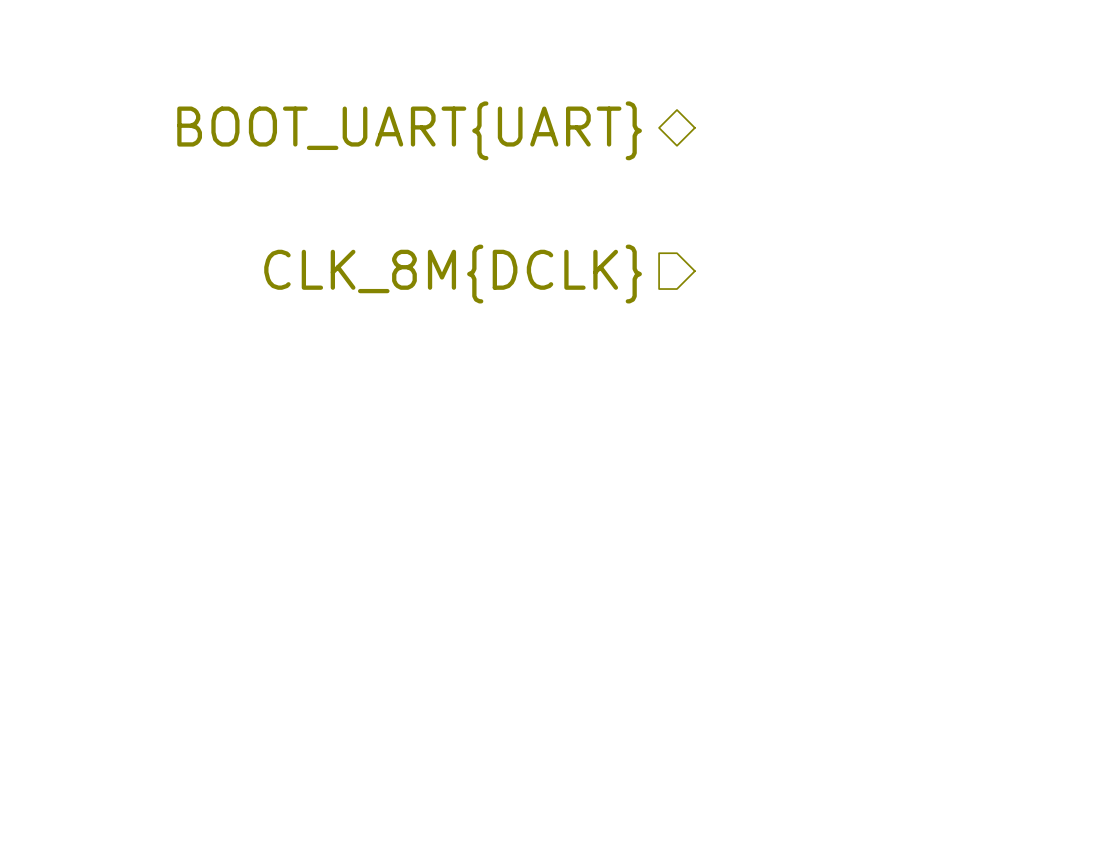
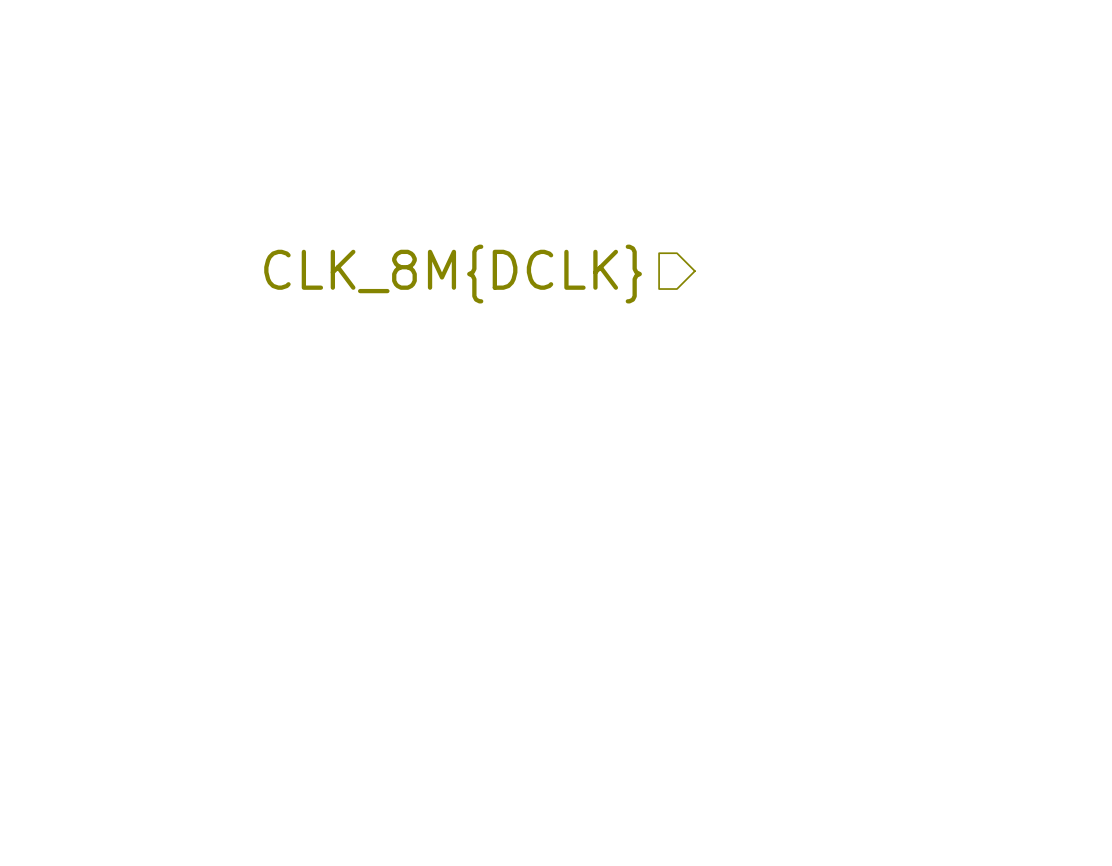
hierarchical label: BOOT_UART{UART} (409, 130) -> none

